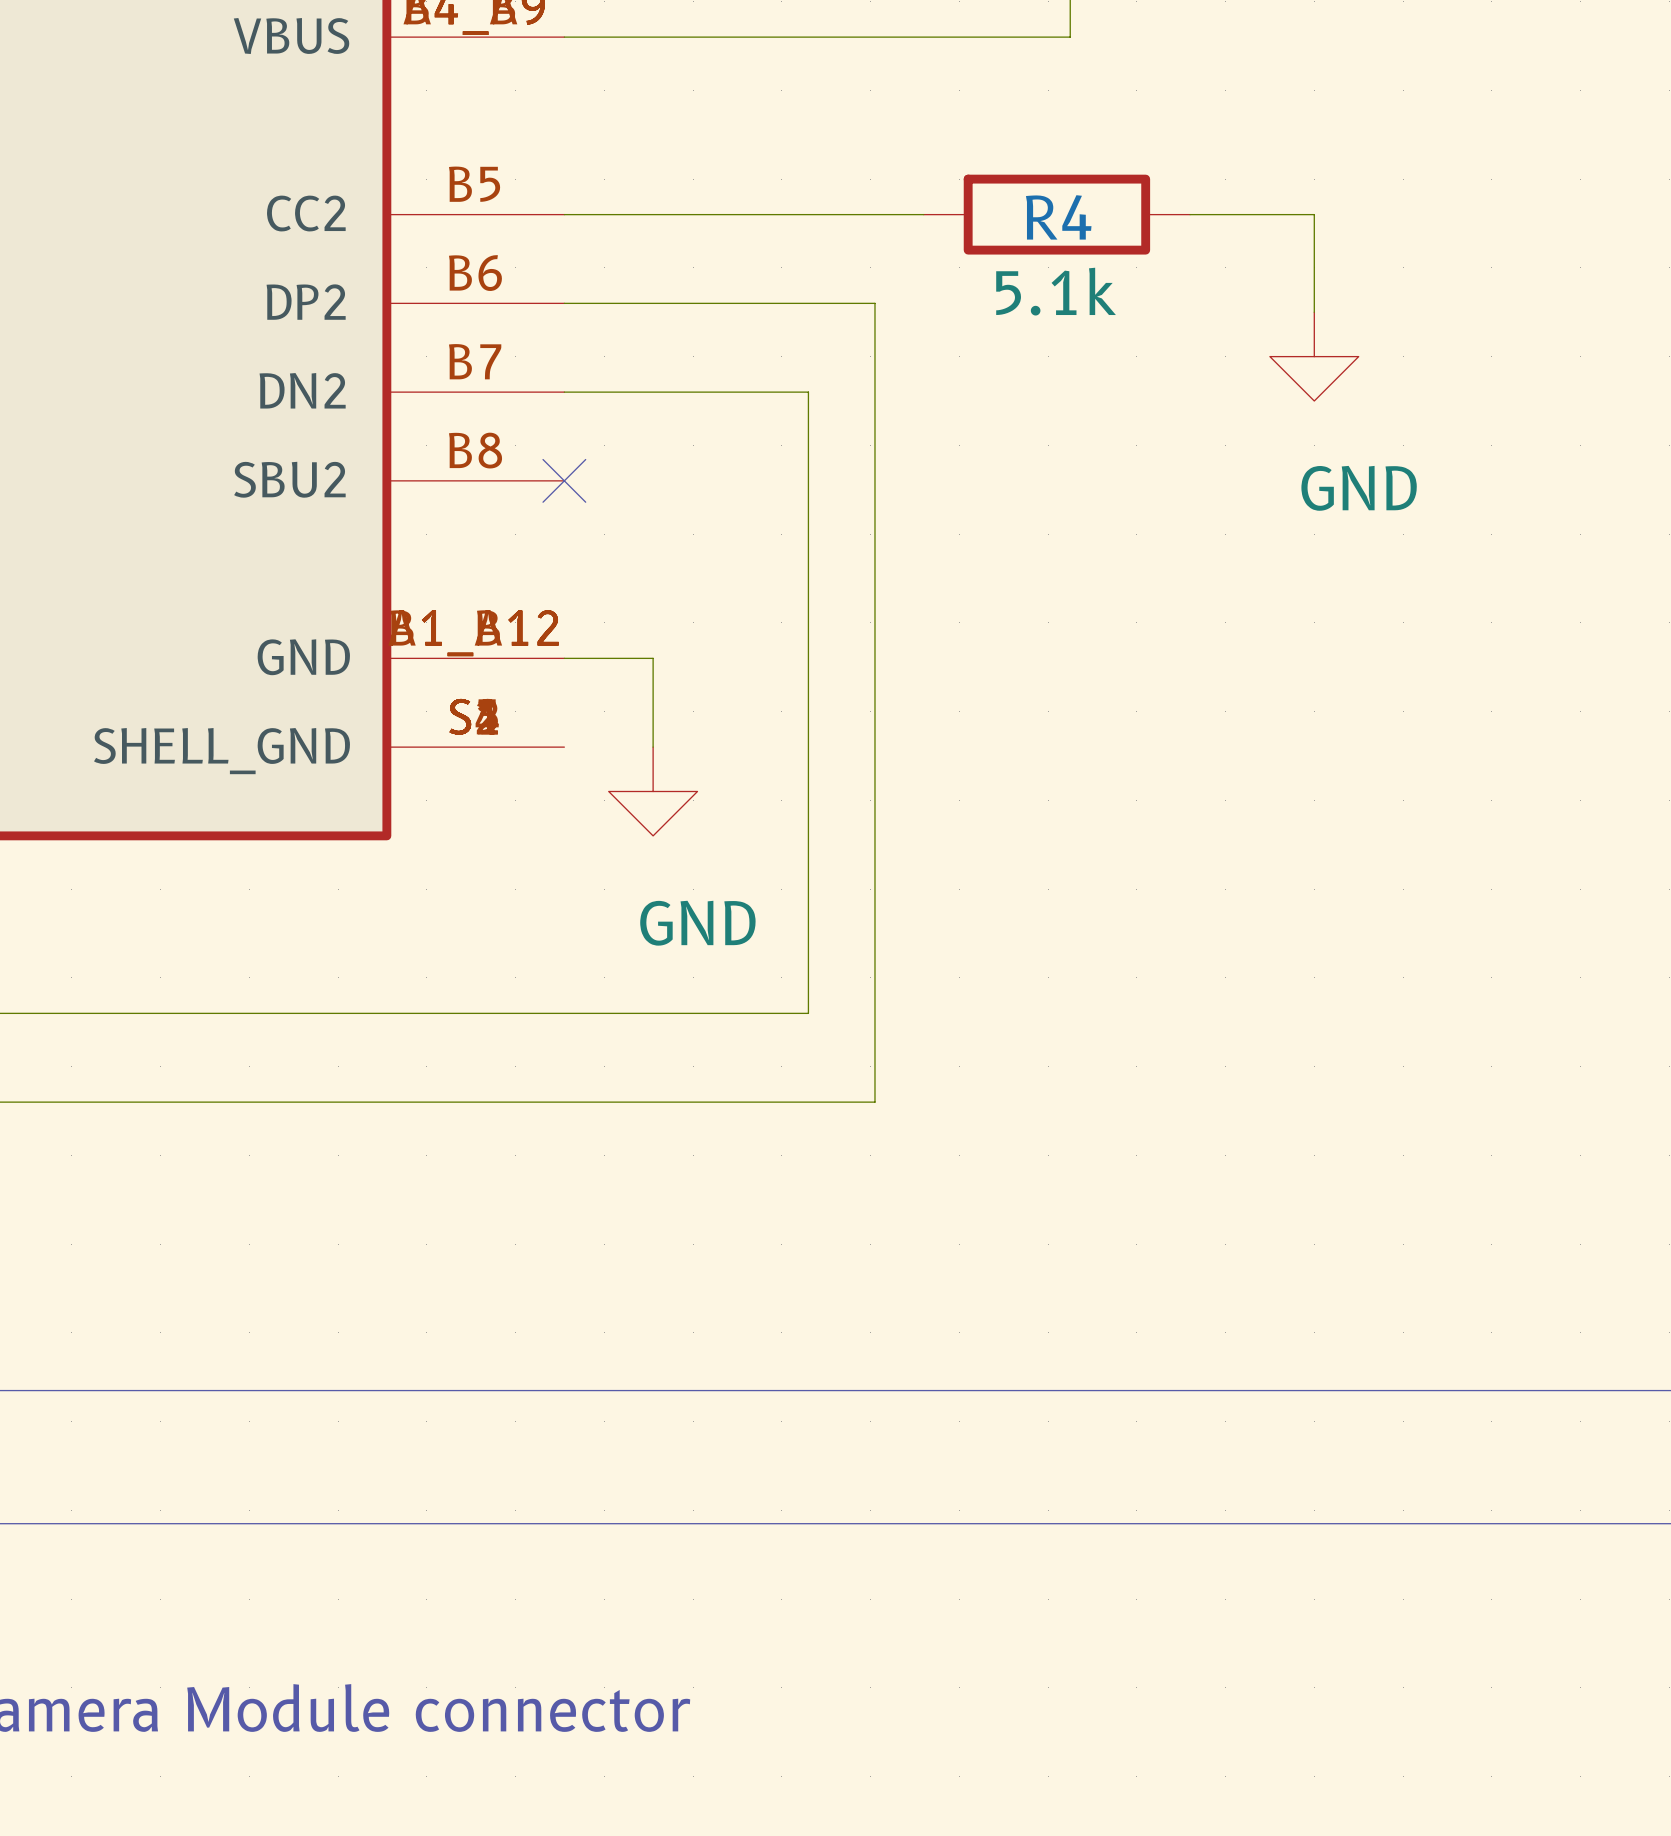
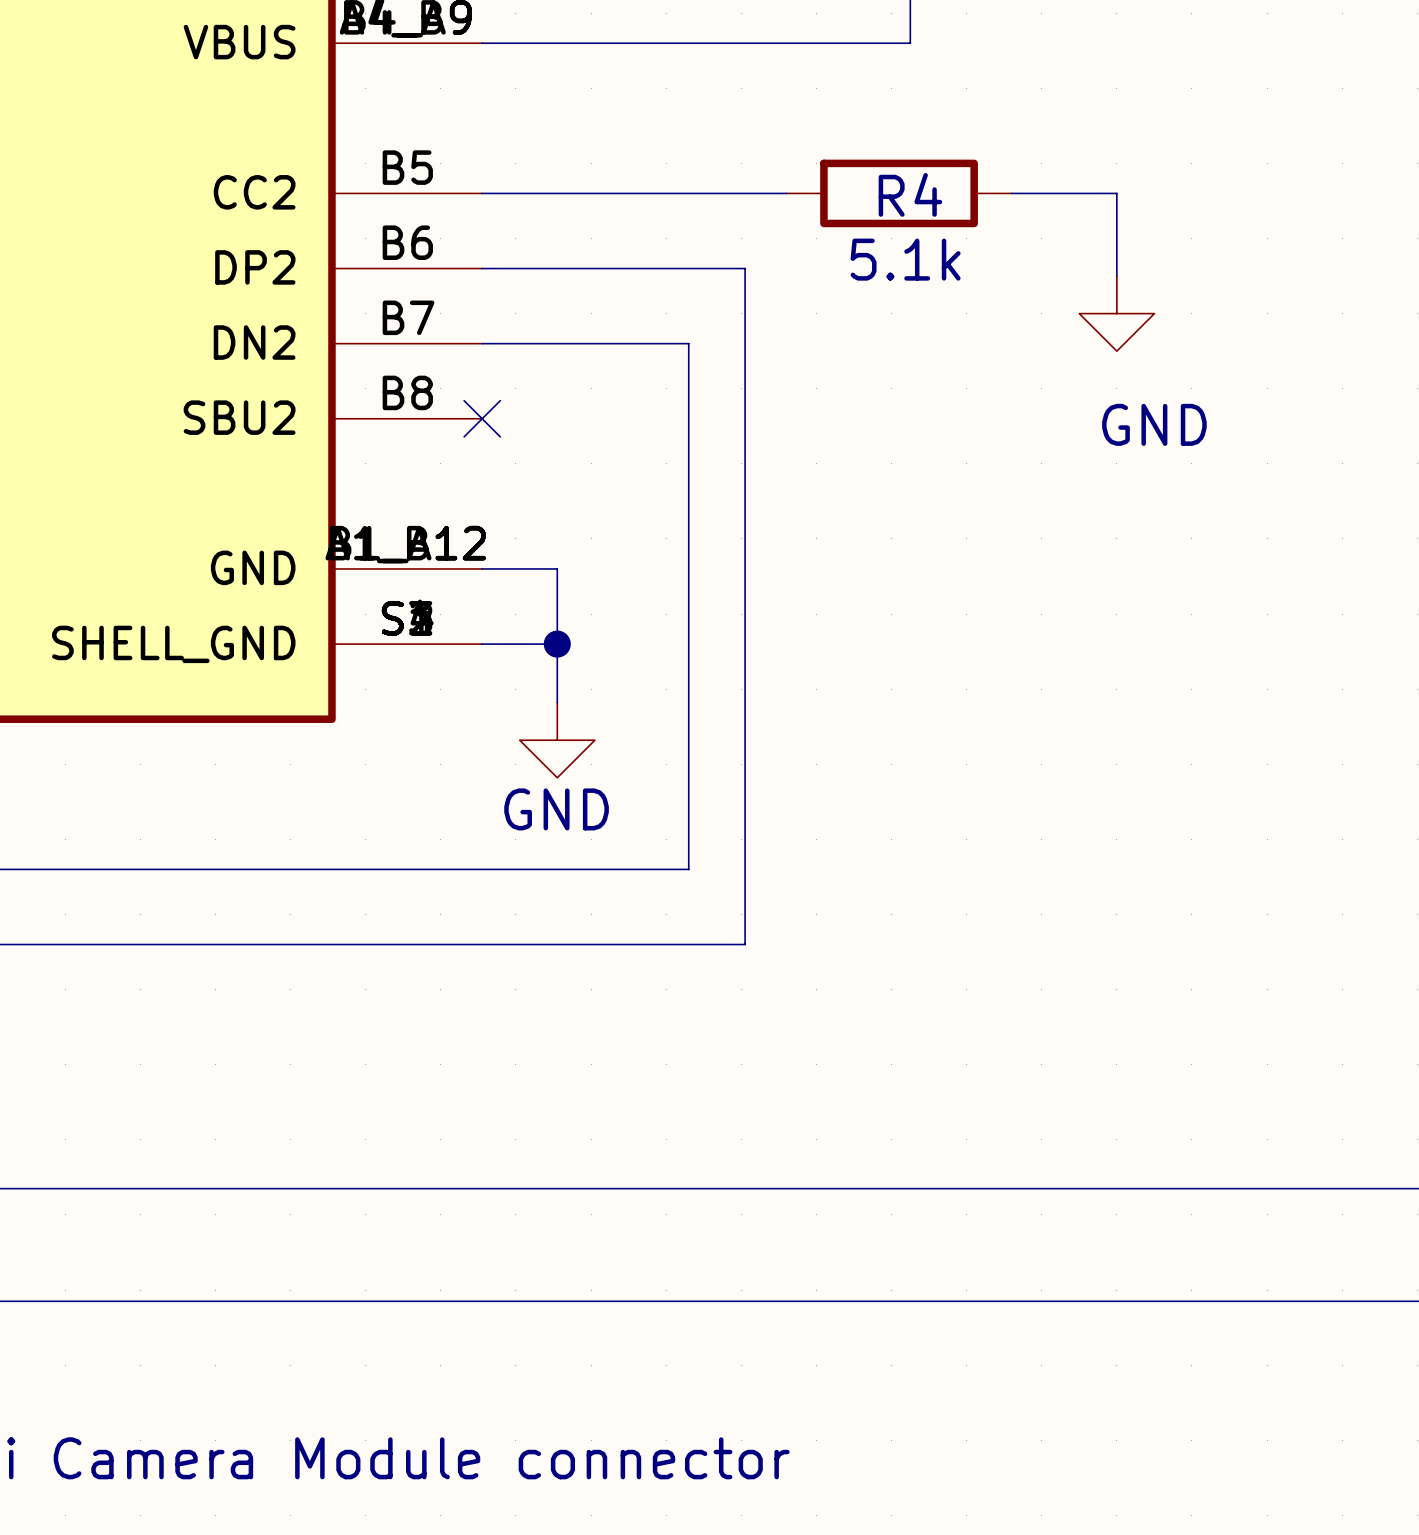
wire: none -> (482, 644) (557, 644) (557, 702)
junction: none -> (557, 644)
power symbol position: GND (653, 791) -> GND (557, 740)
power symbol text position: GND (697, 923) -> GND (556, 809)

